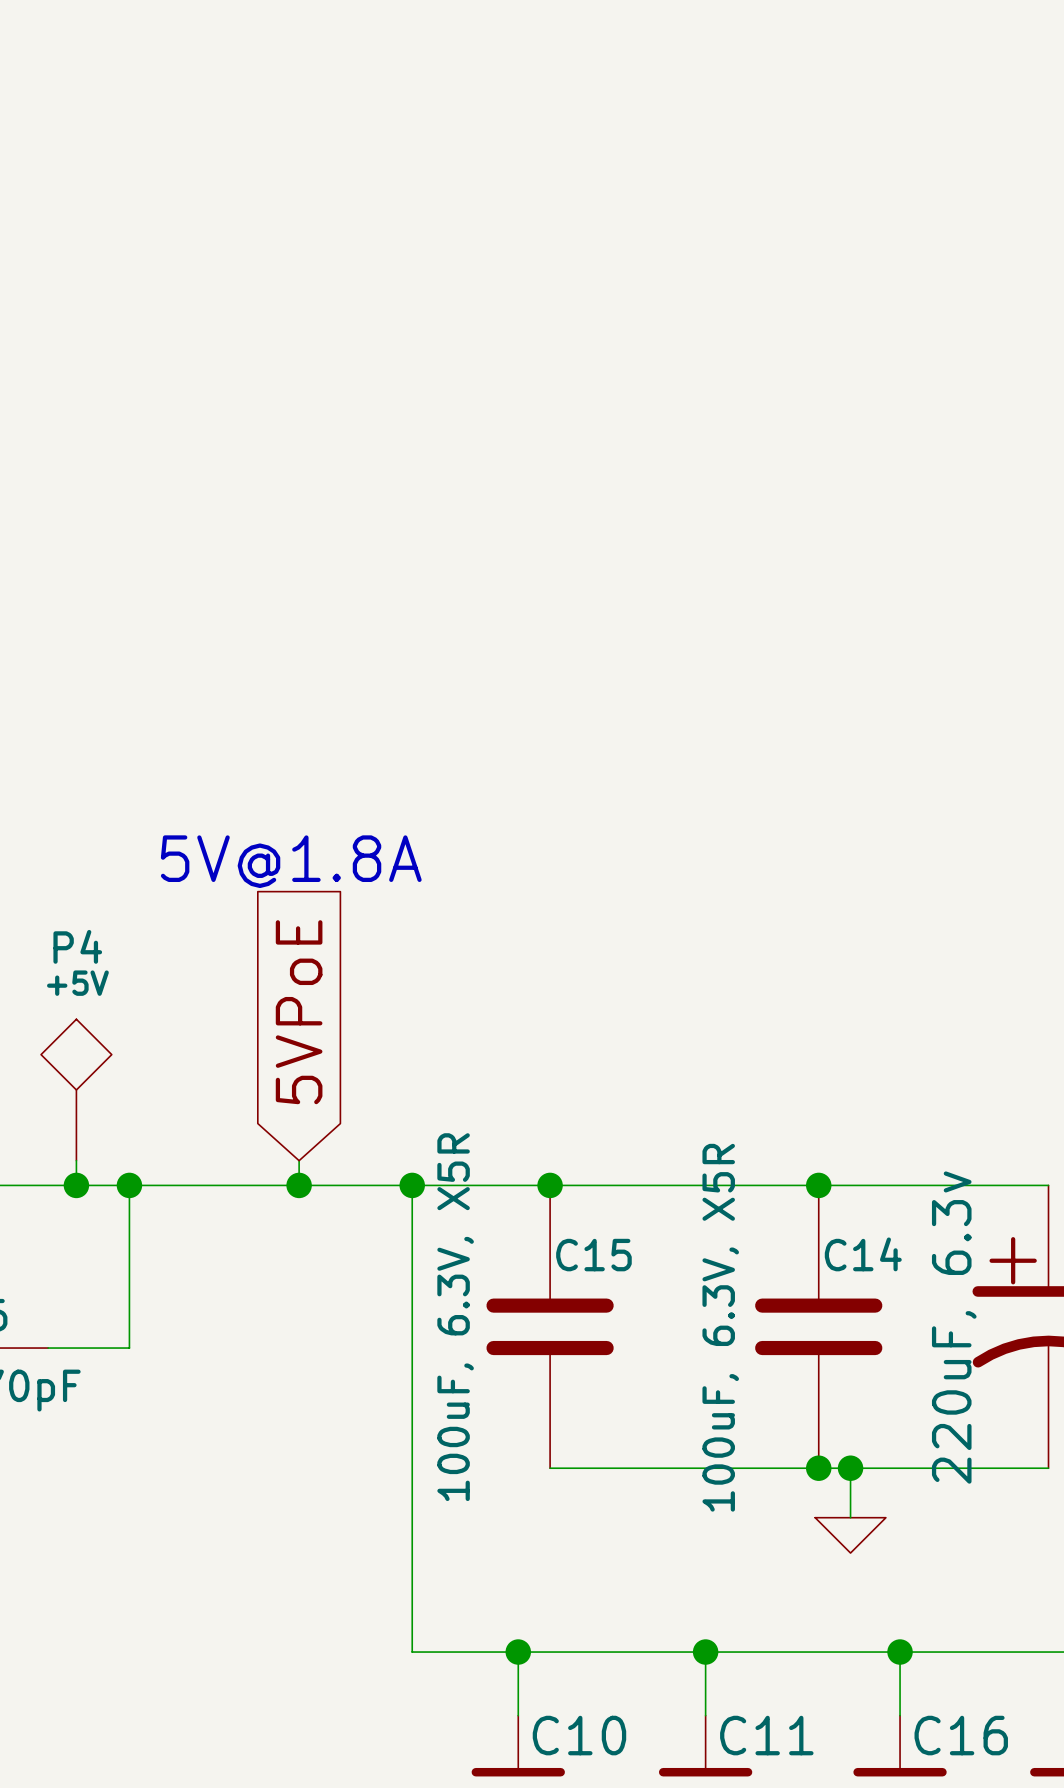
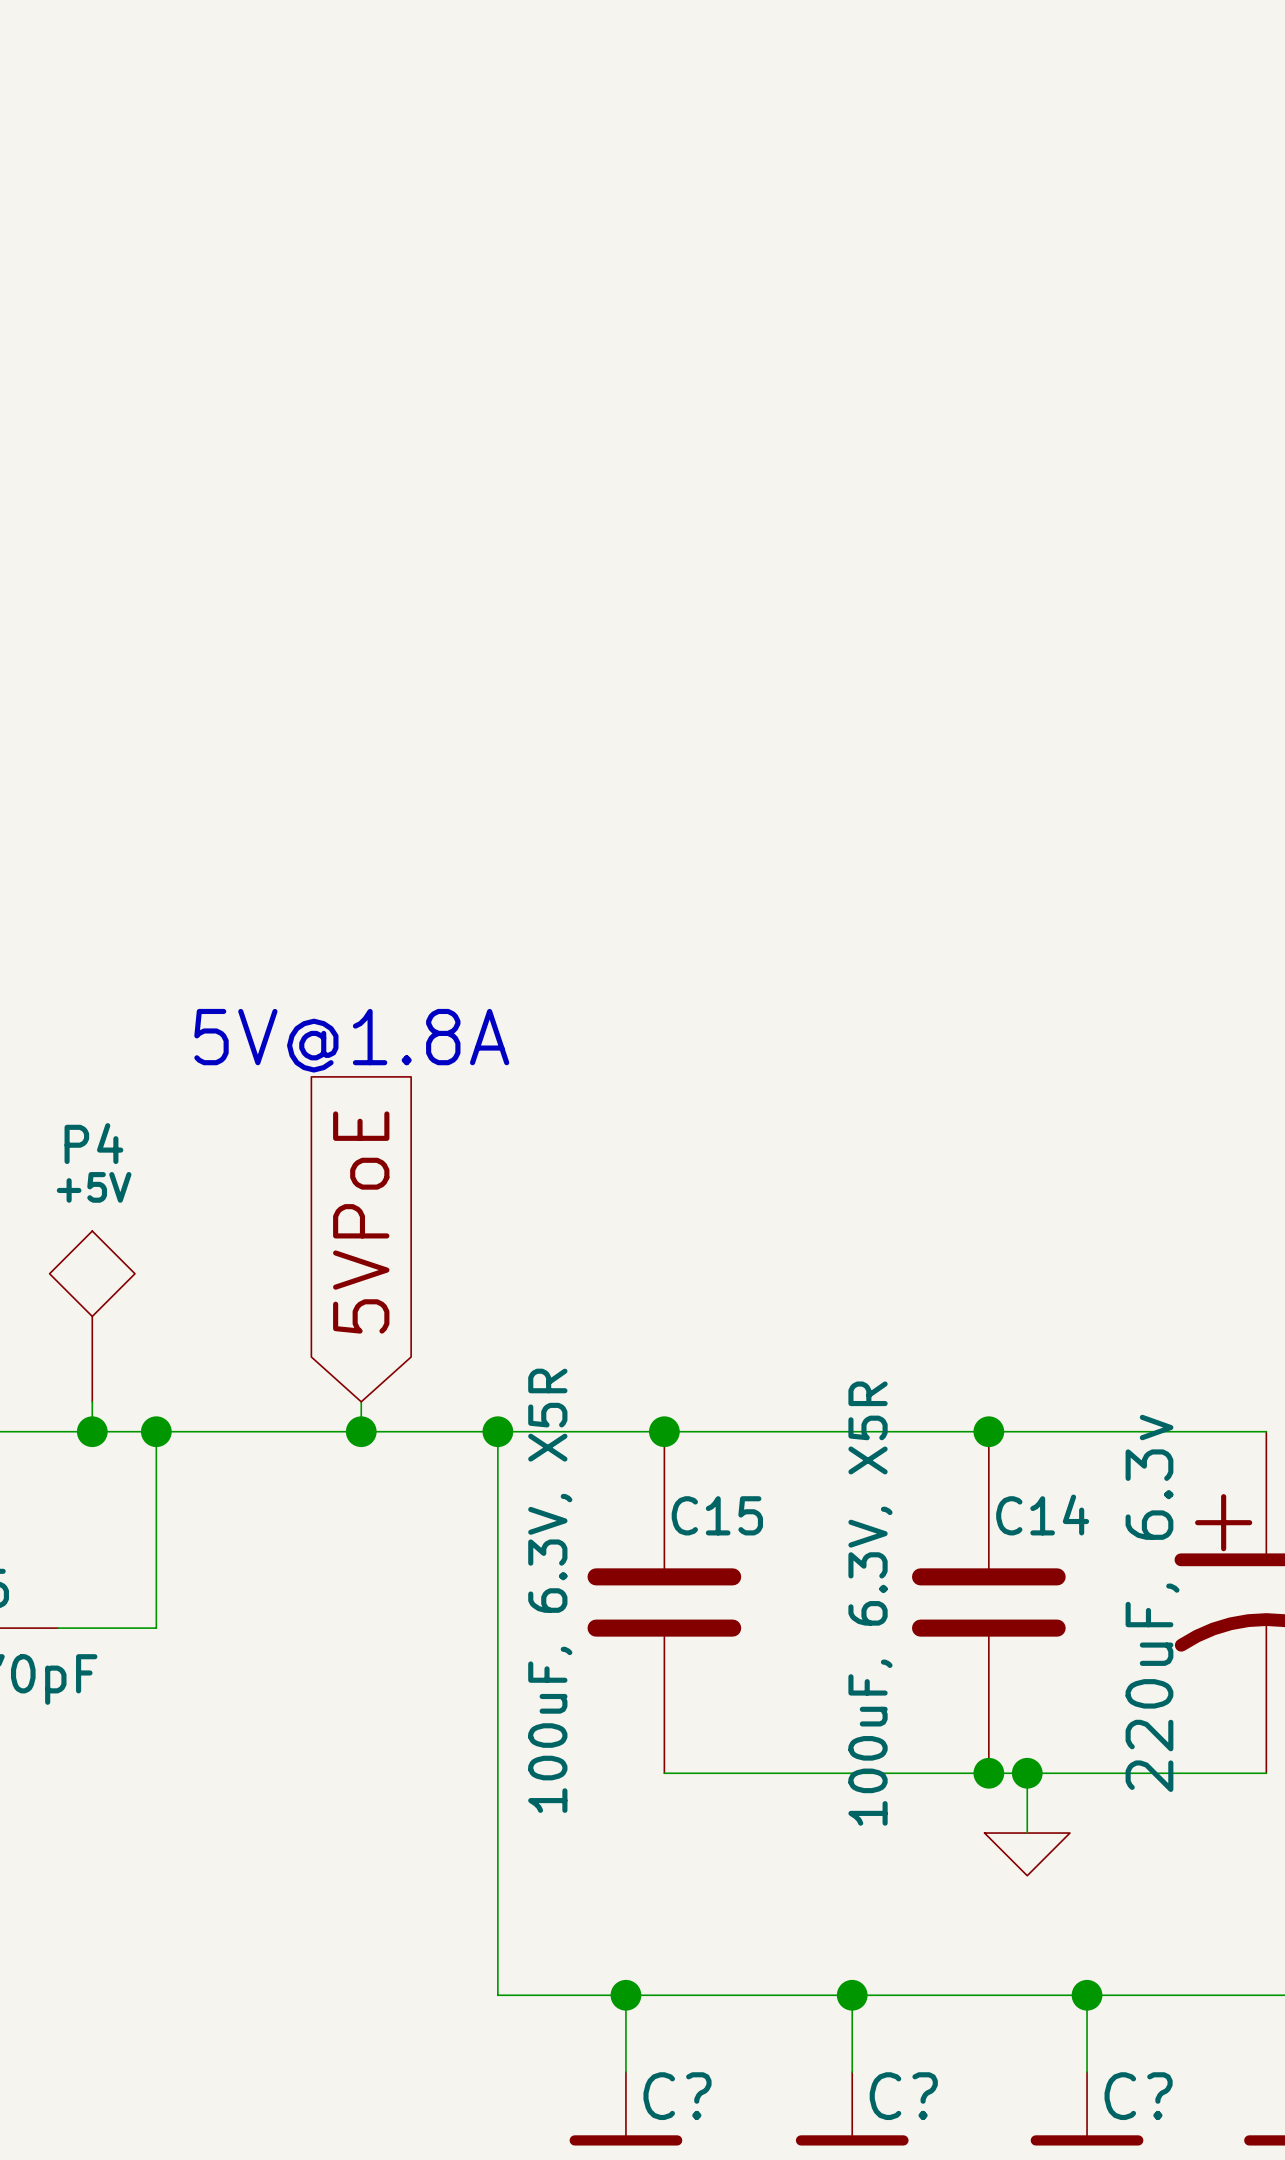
C10 name: C10 (579, 1735) -> C? (677, 2096)
C11 name: C11 (766, 1735) -> C? (903, 2096)
C16 name: C16 (961, 1735) -> C? (1138, 2096)

